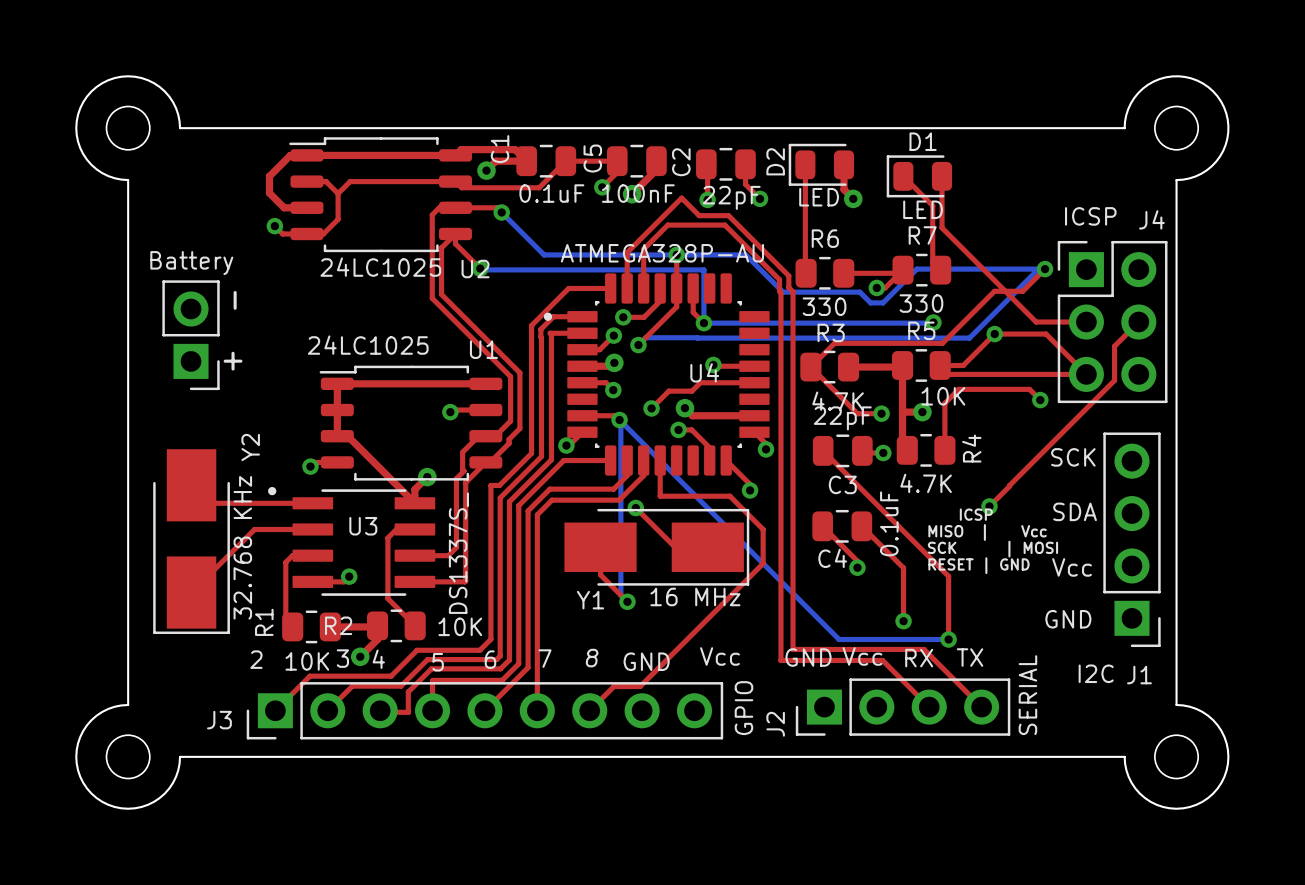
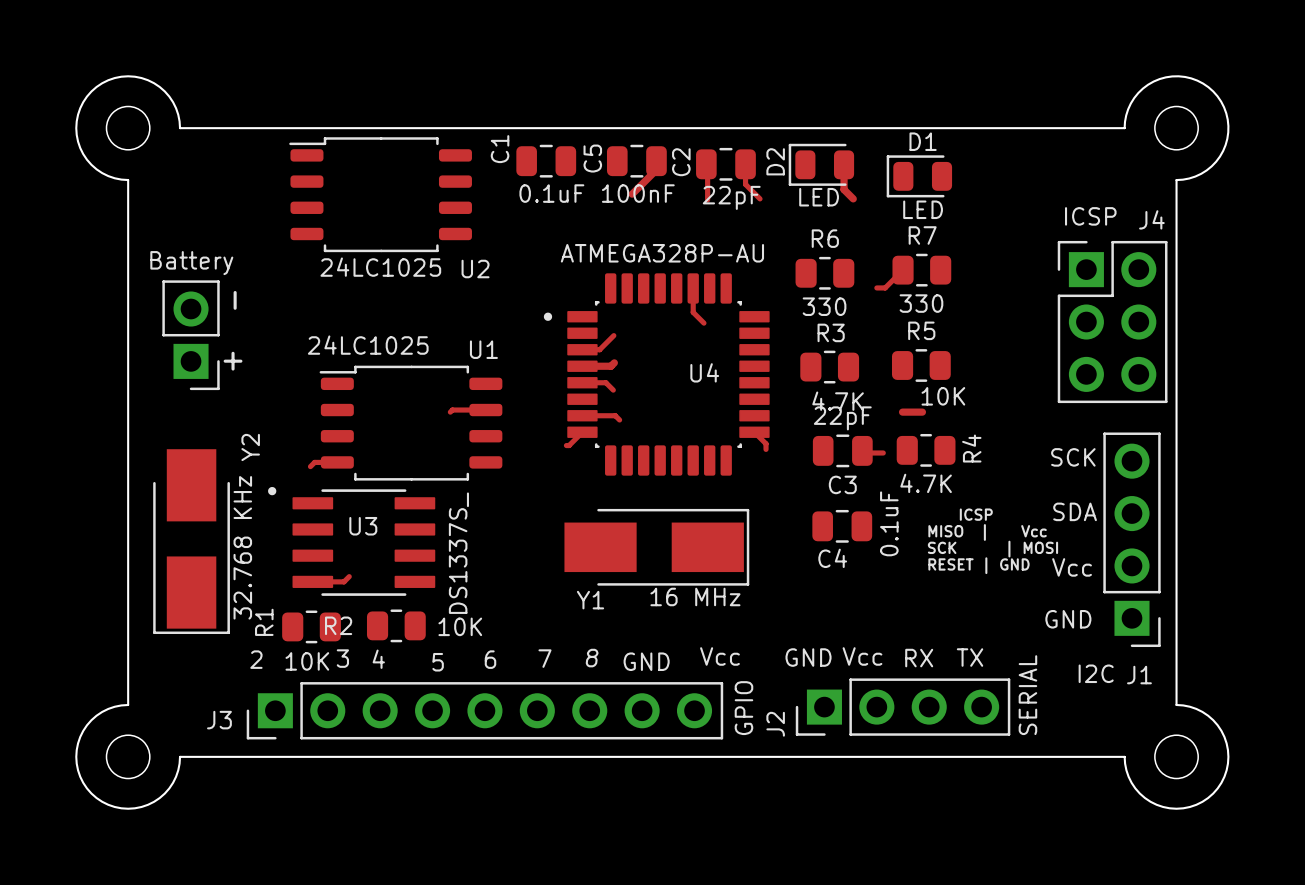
top track: (805, 164) (806, 273) -> none
top track: (486, 170) (495, 161) (526, 161) (515, 149) (461, 149) (455, 155) (290, 155) (269, 176) (269, 193) (284, 207) (306, 207) -> none
via: (486, 170) -> none
top track: (903, 176) (932, 205) (932, 262) (940, 270) -> none
top track: (942, 176) (942, 227) (1036, 322) (1086, 322) -> none
top track: (306, 181) (326, 181) (338, 193) -> none
top track: (602, 187) (617, 172) (617, 161) (565, 161) (539, 187) (461, 187) (455, 181) (350, 181) (338, 193) -> none
via: (602, 187) -> none
top track: (338, 193) (338, 219) (323, 233) (282, 233) (274, 226) -> none
via: (632, 194) -> none
via: (760, 198) -> none
via: (853, 198) -> none
via: (707, 199) -> none
top track: (501, 212) (497, 207) (439, 207) (432, 214) (432, 298) (510, 376) (510, 421) (495, 436) (478, 436) (462, 452) (464, 471) (456, 478) (456, 547) (448, 555) (414, 555) -> none
bottom track: (501, 212) (544, 254) (745, 254) (782, 292) (859, 292) (870, 302) (883, 302) (916, 269) (1045, 269) -> none
via: (501, 212) -> none
via: (274, 226) -> none
top track: (676, 254) (676, 306) (638, 345) -> none
via: (676, 254) -> none
top track: (480, 268) (455, 243) (455, 233) (441, 247) (441, 294) (519, 372) (519, 428) (509, 439) (509, 443) (490, 462) (485, 462) (465, 482) (465, 581) (414, 581) -> none
bottom track: (480, 268) (703, 269) (703, 323) (933, 322) -> none
via: (480, 268) -> none
bottom track: (1038, 269) (969, 338) (645, 337) (638, 345) -> none
top track: (1045, 269) (1022, 291) (994, 291) (942, 343) (834, 343) (810, 367) (857, 413) (881, 413) -> none
via: (1045, 269) -> none
top track: (843, 273) (899, 273) -> none
via: (876, 287) -> none
top track: (610, 288) (568, 288) (531, 325) (531, 453) (499, 485) (490, 485) (490, 639) (479, 650) (417, 650) (391, 676) (309, 676) (275, 710) -> none
top track: (627, 288) (627, 252) (681, 198) (699, 215) (728, 215) (788, 275) (788, 287) (793, 291) (793, 649) (924, 649) (981, 707) -> none
top track: (643, 288) (643, 249) (667, 225) (724, 225) (779, 279) (780, 660) (882, 660) (929, 707) -> none
top track: (660, 288) (660, 301) (644, 317) (623, 317) -> none
top track: (582, 316) (553, 316) (540, 329) (541, 456) (500, 497) (500, 656) (496, 659) (427, 659) (401, 686) (352, 686) (327, 710) -> none
via: (623, 317) -> none
via: (933, 322) -> none
top track: (1138, 322) (1114, 346) (1114, 380) (989, 506) -> none
via: (703, 323) -> none
top track: (582, 333) (550, 333) (551, 459) (509, 501) (509, 659) (500, 668) (431, 668) (408, 692) (408, 712) (380, 710) -> none
top track: (994, 334) (1046, 334) (1086, 374) (949, 374) (940, 365) (963, 365) (994, 334) -> none
via: (994, 334) -> none
via: (613, 335) -> none
via: (638, 345) -> none
via: (614, 362) -> none
top track: (713, 364) (754, 366) -> none
via: (713, 364) -> none
top track: (848, 367) (900, 367) (902, 365) (902, 445) (907, 450) -> none
top track: (754, 382) (700, 382) (692, 391) (668, 391) (651, 408) -> none
top track: (485, 383) (337, 383) (337, 436) (347, 436) (414, 503) (414, 489) (427, 477) -> none
via: (613, 390) -> none
top track: (1040, 400) (1029, 389) (958, 389) (944, 403) (944, 450) -> none
via: (1040, 400) -> none
via: (651, 408) -> none
top track: (684, 408) (692, 415) (754, 415) -> none
via: (684, 408) -> none
via: (450, 412) -> none
via: (922, 412) -> none
via: (881, 413) -> none
bottom track: (619, 419) (839, 639) (948, 639) -> none
via: (619, 419) -> none
bottom track: (620, 421) (620, 595) (627, 601) -> none
top track: (678, 429) (691, 429) (709, 447) (709, 460) -> none
via: (678, 429) -> none
via: (566, 445) -> none
via: (766, 449) -> none
top track: (823, 450) (948, 576) (948, 639) -> none
via: (883, 452) -> none
top track: (610, 460) (563, 460) (518, 505) (518, 663) (502, 680) (433, 680) (432, 710) -> none
top track: (627, 460) (627, 475) (613, 489) (549, 489) (528, 510) (528, 667) (484, 710) -> none
top track: (643, 460) (643, 475) (619, 500) (552, 500) (537, 514) (537, 710) -> none
top track: (660, 460) (660, 496) (729, 496) (763, 529) (763, 563) (640, 686) (613, 686) (589, 710) -> none
top track: (726, 460) (750, 484) (750, 490) -> none
via: (310, 466) -> none
via: (427, 477) -> none
top track: (191, 485) (209, 503) (312, 503) -> none
via: (750, 490) -> none
via: (989, 506) -> none
top track: (635, 508) (675, 547) (707, 547) -> none
via: (635, 508) -> none
top track: (822, 526) (857, 561) (857, 567) -> none
top track: (861, 526) (903, 568) (903, 621) -> none
top track: (312, 529) (254, 529) (191, 592) -> none
top track: (414, 529) (396, 529) (387, 537) (387, 598) (415, 625) -> none
top track: (600, 547) (600, 574) (627, 601) -> none
top track: (312, 555) (292, 555) (285, 562) (285, 620) (292, 626) -> none
via: (857, 567) -> none
via: (349, 576) -> none
via: (627, 601) -> none
via: (903, 621) -> none
top track: (330, 626) (377, 625) (377, 639) (360, 656) -> none
via: (948, 639) -> none
via: (360, 656) -> none

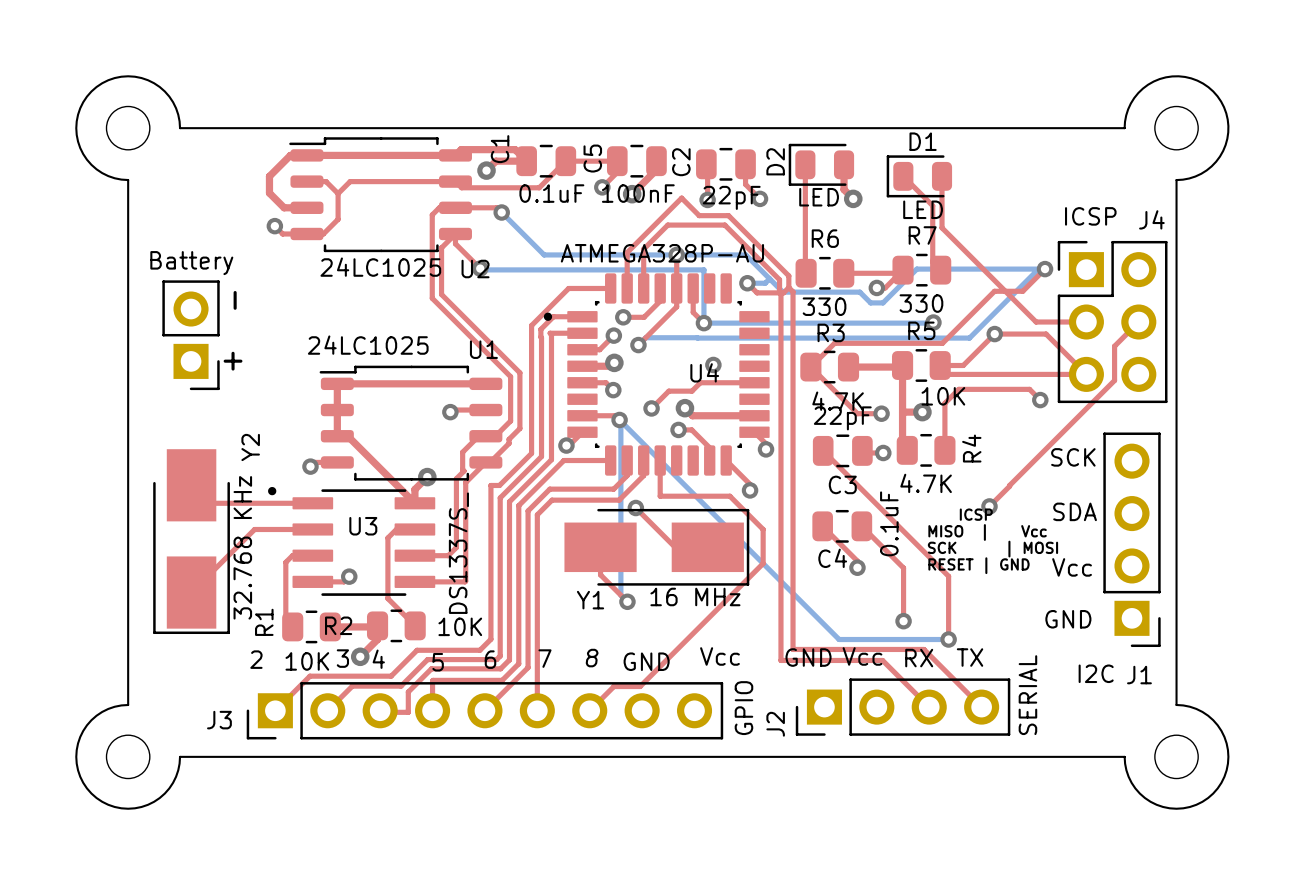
top track: none -> (805, 164) (806, 273)
top track: none -> (486, 170) (495, 161) (526, 161) (515, 149) (461, 149) (455, 155) (290, 155) (269, 176) (269, 193) (284, 207) (306, 207)
via: none -> (486, 170)
top track: none -> (903, 176) (932, 205) (932, 262) (940, 270)
top track: none -> (942, 176) (942, 227) (1036, 322) (1086, 322)
top track: none -> (306, 181) (326, 181) (338, 193)
top track: none -> (602, 187) (617, 172) (617, 161) (565, 161) (539, 187) (461, 187) (455, 181) (350, 181) (338, 193)
via: none -> (602, 187)
top track: none -> (338, 193) (338, 219) (323, 233) (282, 233) (274, 226)
via: none -> (632, 194)
via: none -> (760, 198)
via: none -> (853, 198)
via: none -> (707, 199)
top track: none -> (501, 212) (497, 207) (439, 207) (432, 214) (432, 298) (510, 376) (510, 421) (495, 436) (478, 436) (462, 452) (464, 471) (456, 478) (456, 547) (448, 555) (414, 555)
bottom track: none -> (501, 212) (544, 254) (745, 254) (782, 292) (859, 292) (870, 302) (883, 302) (916, 269) (1045, 269)
via: none -> (501, 212)
via: none -> (274, 226)
top track: none -> (676, 254) (676, 306) (638, 345)
via: none -> (676, 254)
top track: none -> (480, 268) (455, 243) (455, 233) (441, 247) (441, 294) (519, 372) (519, 428) (509, 439) (509, 443) (490, 462) (485, 462) (465, 482) (465, 581) (414, 581)
bottom track: none -> (480, 268) (703, 269) (703, 323) (933, 322)
via: none -> (480, 268)
bottom track: none -> (1038, 269) (969, 338) (645, 337) (638, 345)
top track: none -> (1045, 269) (1022, 291) (994, 291) (942, 343) (834, 343) (810, 367) (857, 413) (881, 413)
via: none -> (1045, 269)
top track: none -> (843, 273) (899, 273)
bottom track: none -> (769, 278) (765, 283) (747, 283)
top track: none -> (747, 283) (757, 292) (783, 292) (788, 287)
via: none -> (747, 283)
top track: none -> (788, 287) (788, 275) (728, 215) (699, 215) (681, 198) (627, 252) (627, 288)
top track: none -> (788, 287) (793, 291) (793, 649) (924, 649) (981, 707)
via: none -> (876, 287)
top track: none -> (610, 288) (568, 288) (531, 325) (531, 453) (499, 485) (490, 485) (490, 639) (479, 650) (417, 650) (391, 676) (309, 676) (275, 710)
top track: none -> (643, 288) (643, 249) (667, 225) (724, 225) (779, 279) (780, 660) (882, 660) (929, 707)
top track: none -> (660, 288) (660, 301) (644, 317) (623, 317)
top track: none -> (582, 316) (553, 316) (540, 329) (541, 456) (500, 497) (500, 656) (496, 659) (427, 659) (401, 686) (352, 686) (327, 710)
via: none -> (623, 317)
via: none -> (933, 322)
top track: none -> (1138, 322) (1114, 346) (1114, 380) (989, 506)
via: none -> (703, 323)
top track: none -> (582, 333) (550, 333) (551, 459) (509, 501) (509, 659) (500, 668) (431, 668) (408, 692) (408, 712) (380, 710)
top track: none -> (994, 334) (1046, 334) (1086, 374) (949, 374) (940, 365) (963, 365) (994, 334)
via: none -> (994, 334)
via: none -> (613, 335)
via: none -> (638, 345)
via: none -> (614, 362)
via: none -> (713, 364)
top track: none -> (848, 367) (900, 367) (902, 365) (902, 445) (907, 450)
top track: none -> (754, 382) (700, 382) (692, 391) (668, 391) (651, 408)
top track: none -> (485, 383) (337, 383) (337, 436) (347, 436) (414, 503) (414, 489) (427, 477)
via: none -> (613, 390)
top track: none -> (1040, 400) (1029, 389) (958, 389) (944, 403) (944, 450)
via: none -> (1040, 400)
via: none -> (651, 408)
top track: none -> (684, 408) (692, 415) (754, 415)
via: none -> (684, 408)
via: none -> (450, 412)
via: none -> (922, 412)
via: none -> (881, 413)
bottom track: none -> (619, 419) (839, 639) (948, 639)
via: none -> (619, 419)
bottom track: none -> (620, 421) (620, 595) (627, 601)
top track: none -> (678, 429) (691, 429) (709, 447) (709, 460)
via: none -> (678, 429)
via: none -> (566, 445)
via: none -> (766, 449)
top track: none -> (823, 450) (948, 576) (948, 639)
via: none -> (883, 452)
top track: none -> (610, 460) (563, 460) (518, 505) (518, 663) (502, 680) (433, 680) (432, 710)
top track: none -> (627, 460) (627, 475) (613, 489) (549, 489) (528, 510) (528, 667) (484, 710)
top track: none -> (643, 460) (643, 475) (619, 500) (552, 500) (537, 514) (537, 710)
top track: none -> (660, 460) (660, 496) (729, 496) (763, 529) (763, 563) (640, 686) (613, 686) (589, 710)
top track: none -> (726, 460) (750, 484) (750, 490)
via: none -> (310, 466)
via: none -> (427, 477)
top track: none -> (191, 485) (209, 503) (312, 503)
via: none -> (750, 490)
via: none -> (989, 506)
top track: none -> (635, 508) (675, 547) (707, 547)
via: none -> (635, 508)
top track: none -> (822, 526) (857, 561) (857, 567)
top track: none -> (861, 526) (903, 568) (903, 621)
top track: none -> (312, 529) (254, 529) (191, 592)
top track: none -> (414, 529) (396, 529) (387, 537) (387, 598) (415, 625)
top track: none -> (600, 547) (600, 574) (627, 601)
top track: none -> (312, 555) (292, 555) (285, 562) (285, 620) (292, 626)
via: none -> (857, 567)
via: none -> (349, 576)
via: none -> (627, 601)
via: none -> (903, 621)
top track: none -> (330, 626) (377, 625) (377, 639) (360, 656)
via: none -> (948, 639)
via: none -> (360, 656)

